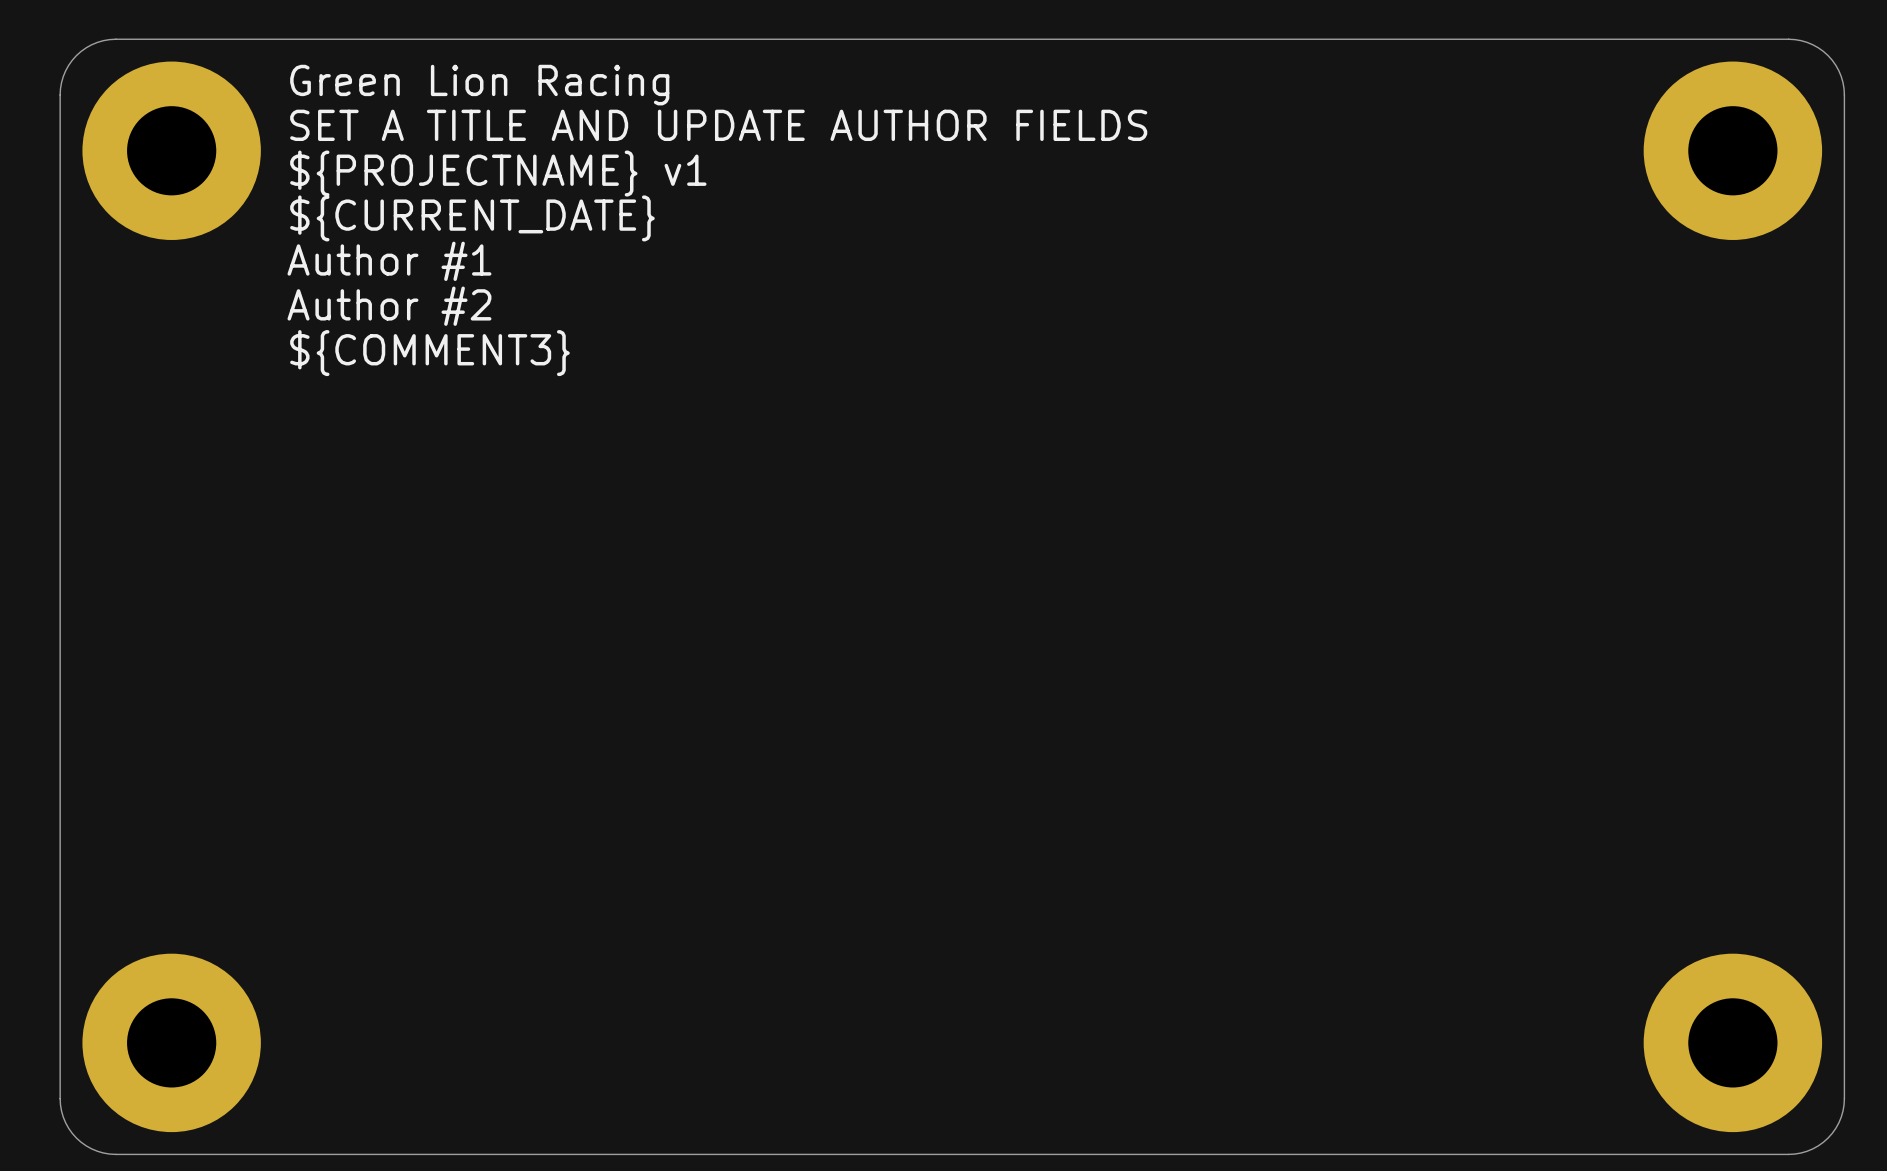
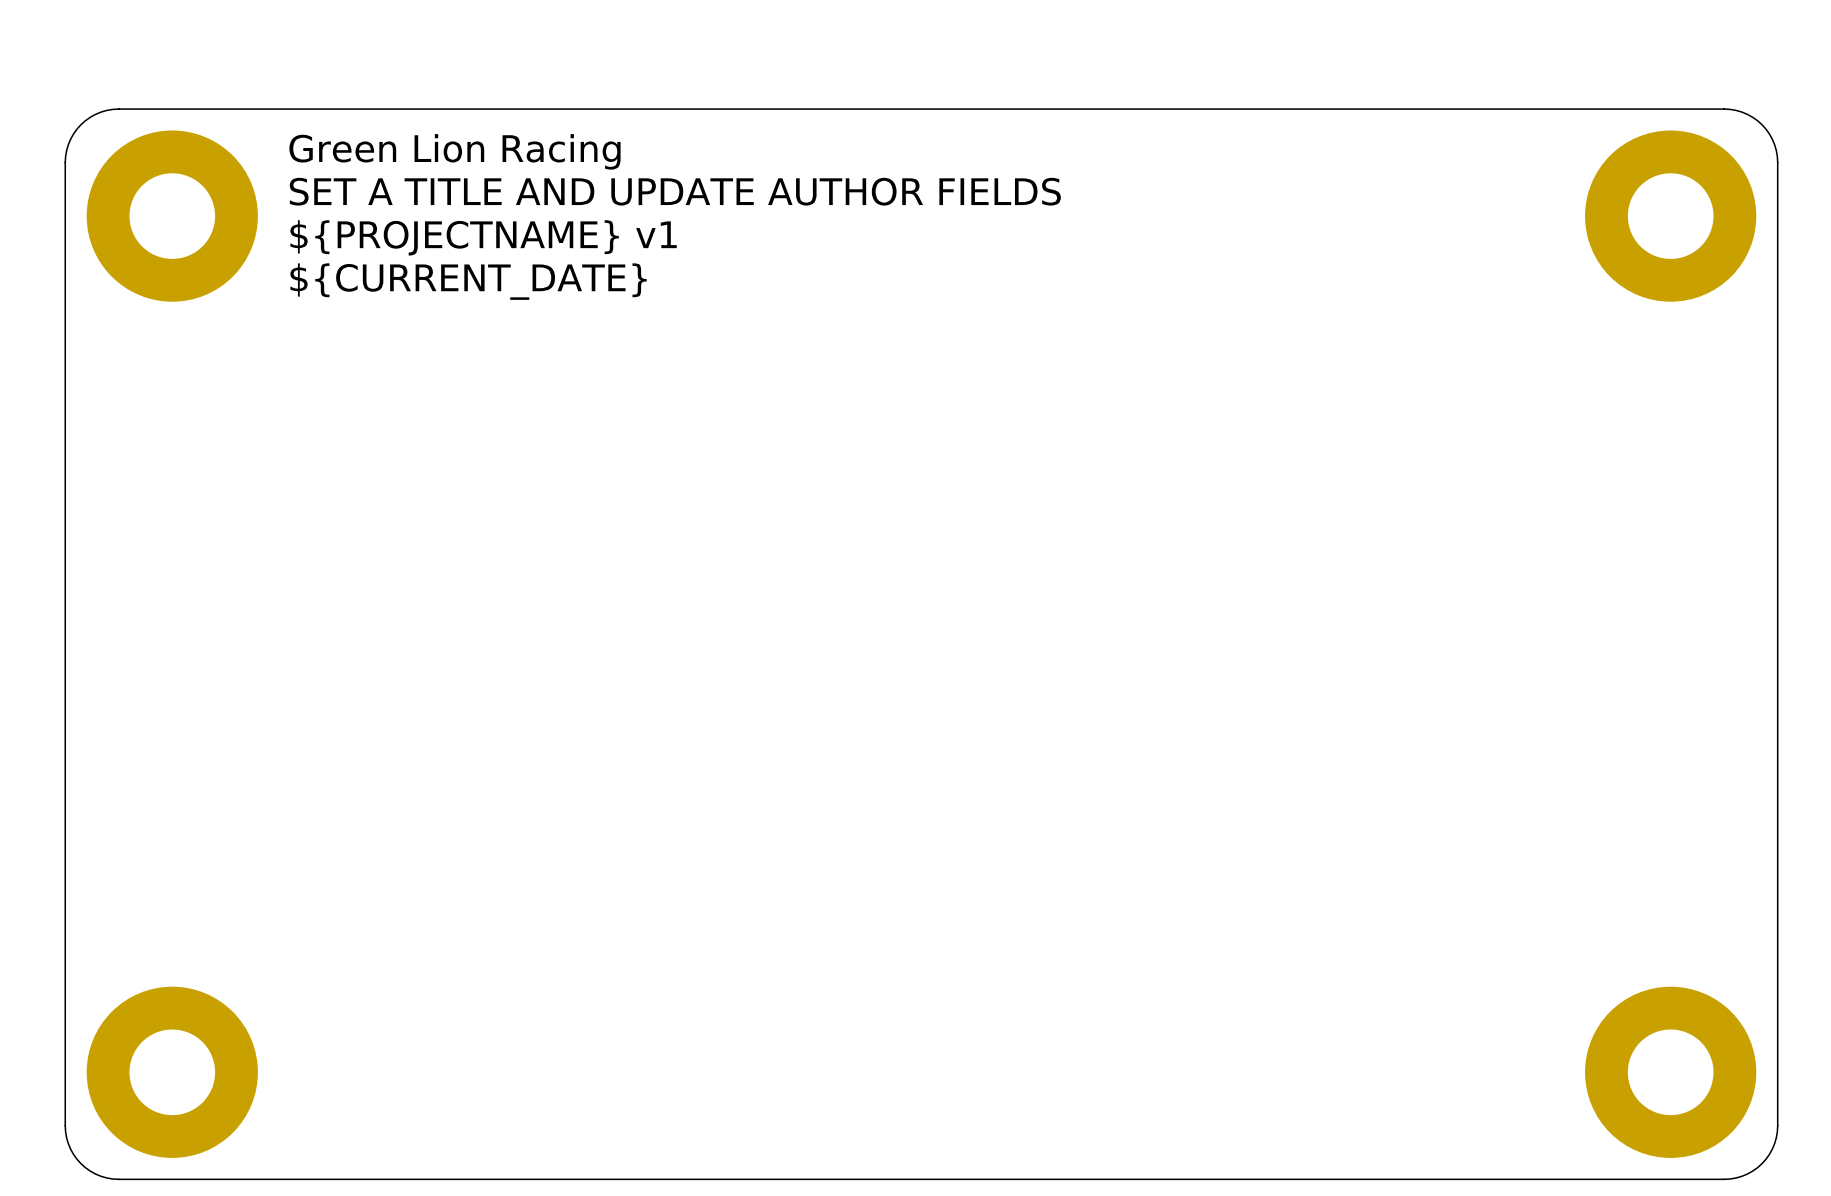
text: Green Lion Racing (479, 85) -> none
text: SET A TITLE AND UPDATE AUTHOR FIELDS (718, 125) -> Green Lion Racing (454, 151)
text: ${PROJECTNAME} v1 (498, 173) -> SET A TITLE AND UPDATE AUTHOR FIELDS (675, 191)
text: ${CURRENT_DATE} (472, 218) -> ${PROJECTNAME} v1 (483, 237)
text: Author #1 (389, 261) -> ${CURRENT_DATE} (468, 281)
text: Author #2 (389, 306) -> none
text: ${COMMENT3} (429, 353) -> none

